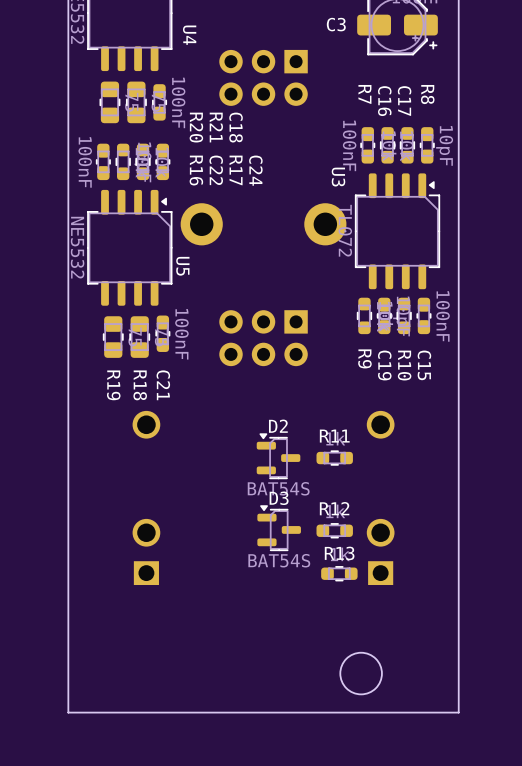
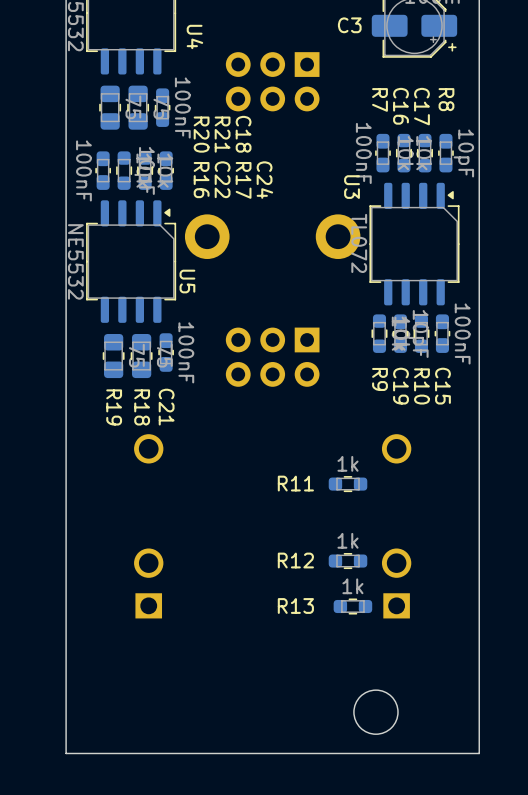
R11 name position: R11 (334, 436) -> R11 (295, 483)
D2: BAT54S (278, 456) -> none
R12 name position: R12 (334, 508) -> R12 (295, 560)
D3: BAT54S (279, 528) -> none
R13 name position: R13 (339, 553) -> R13 (295, 605)

